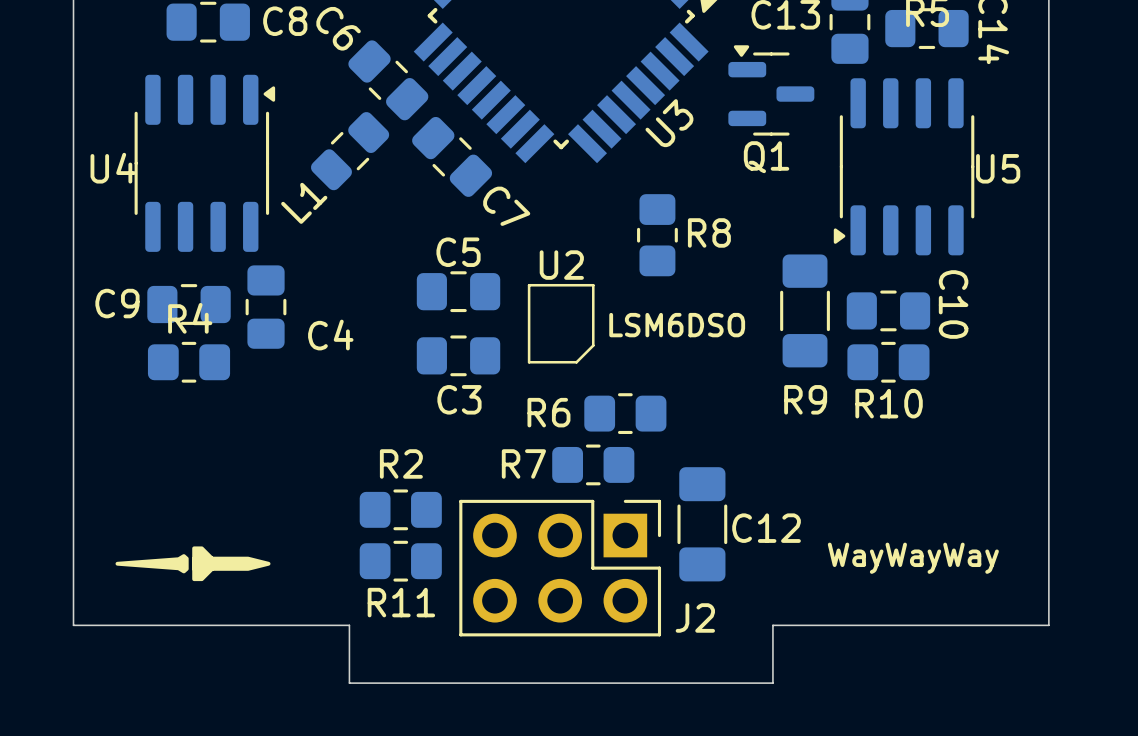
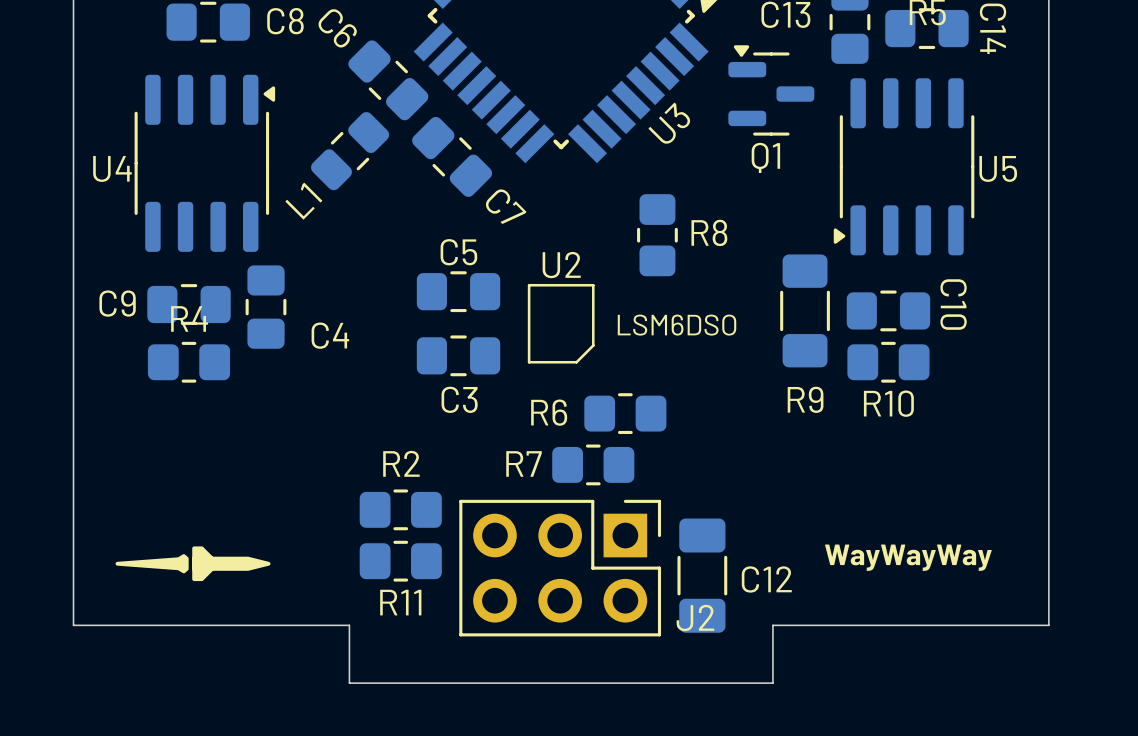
C12 position: (702, 524) -> (702, 575)

